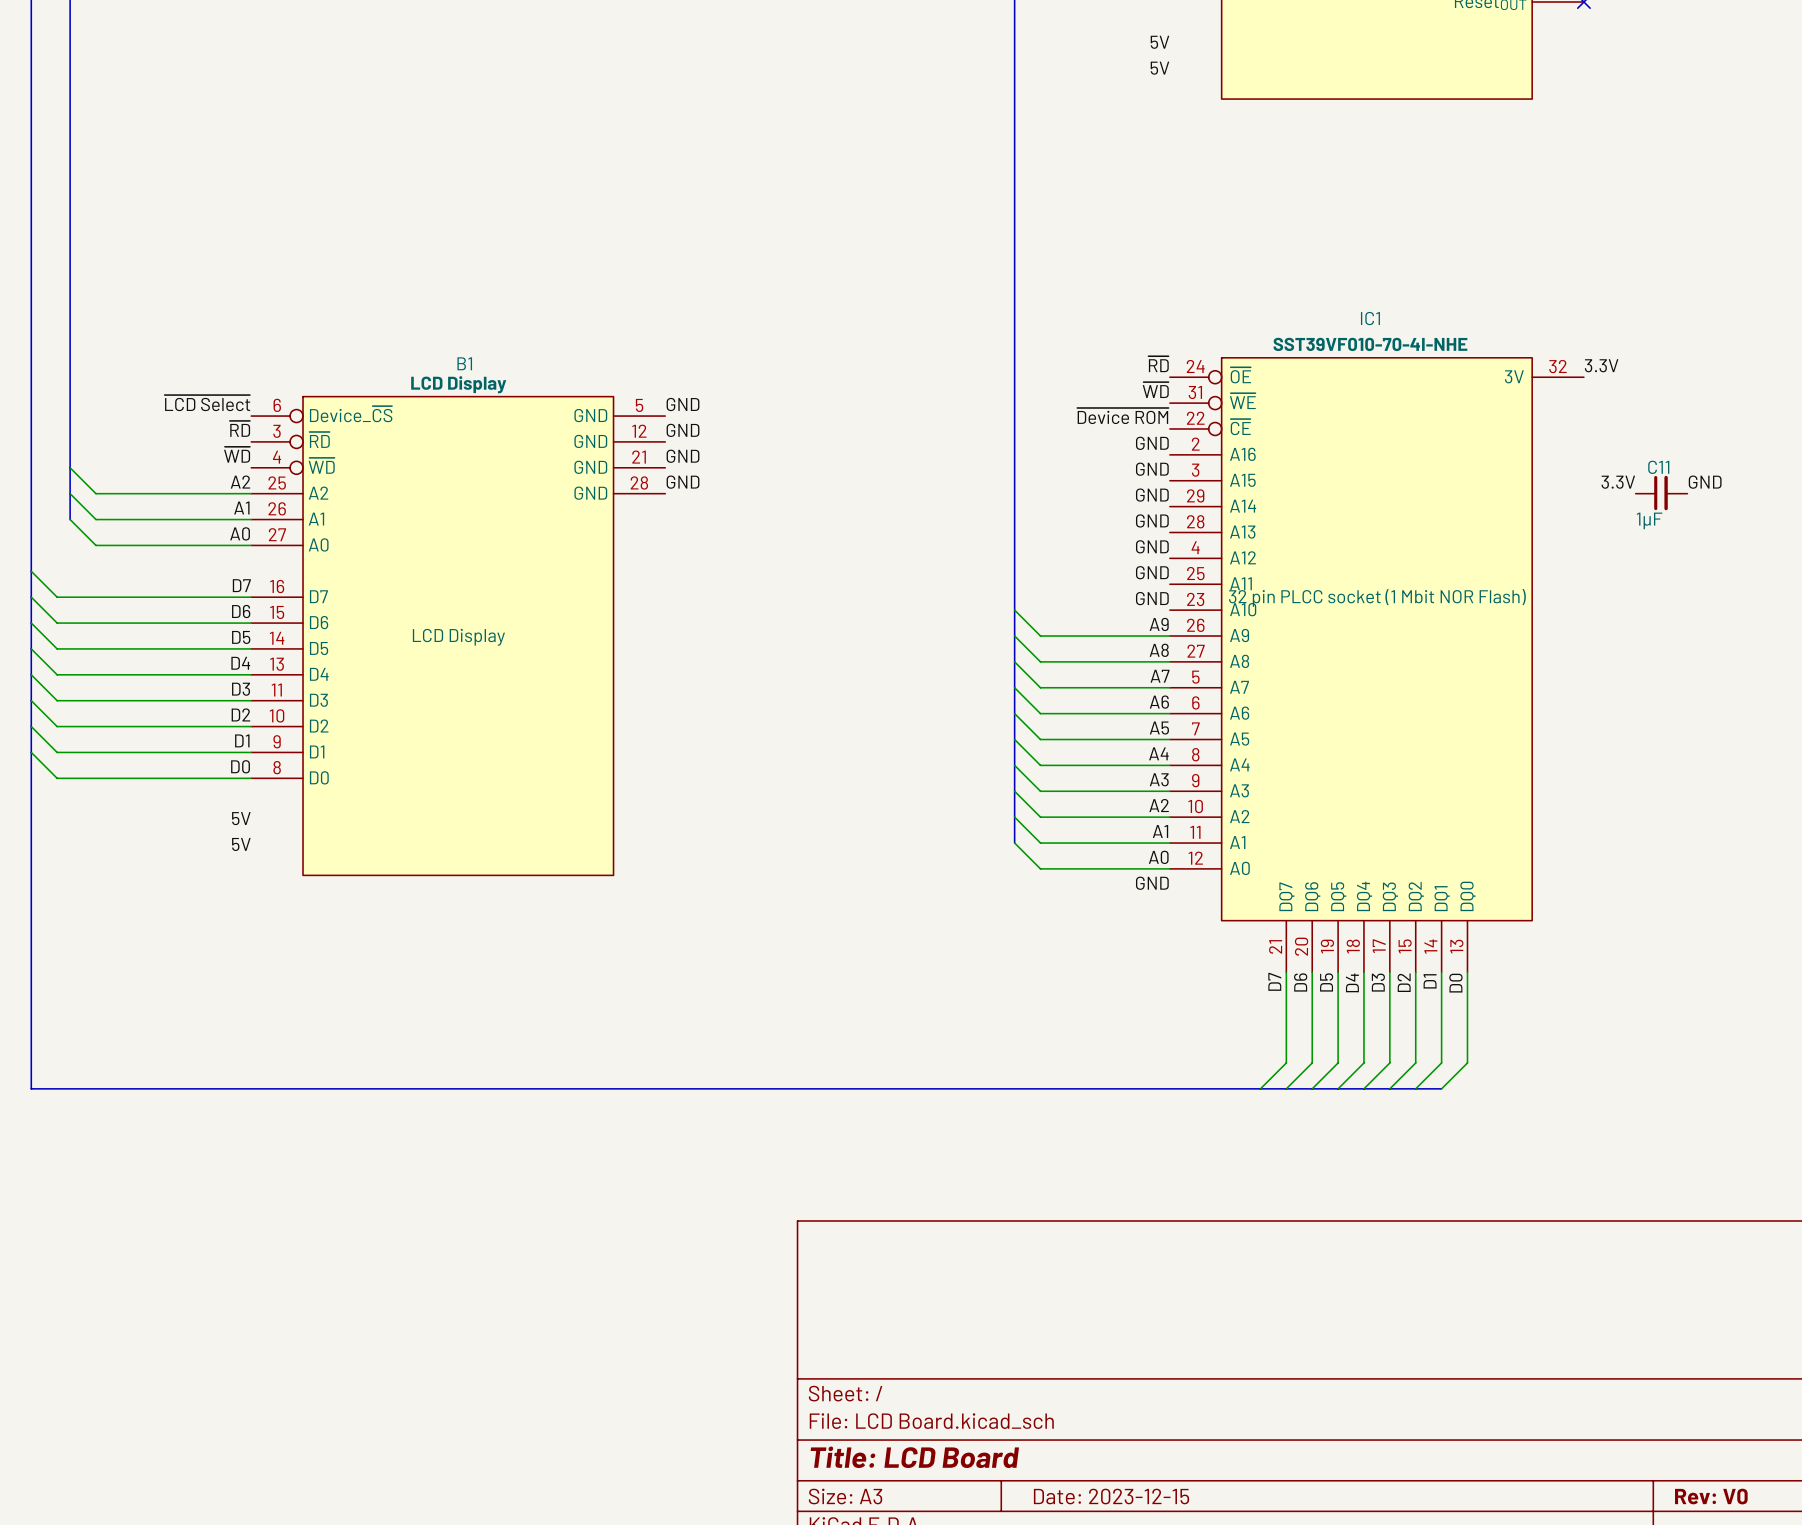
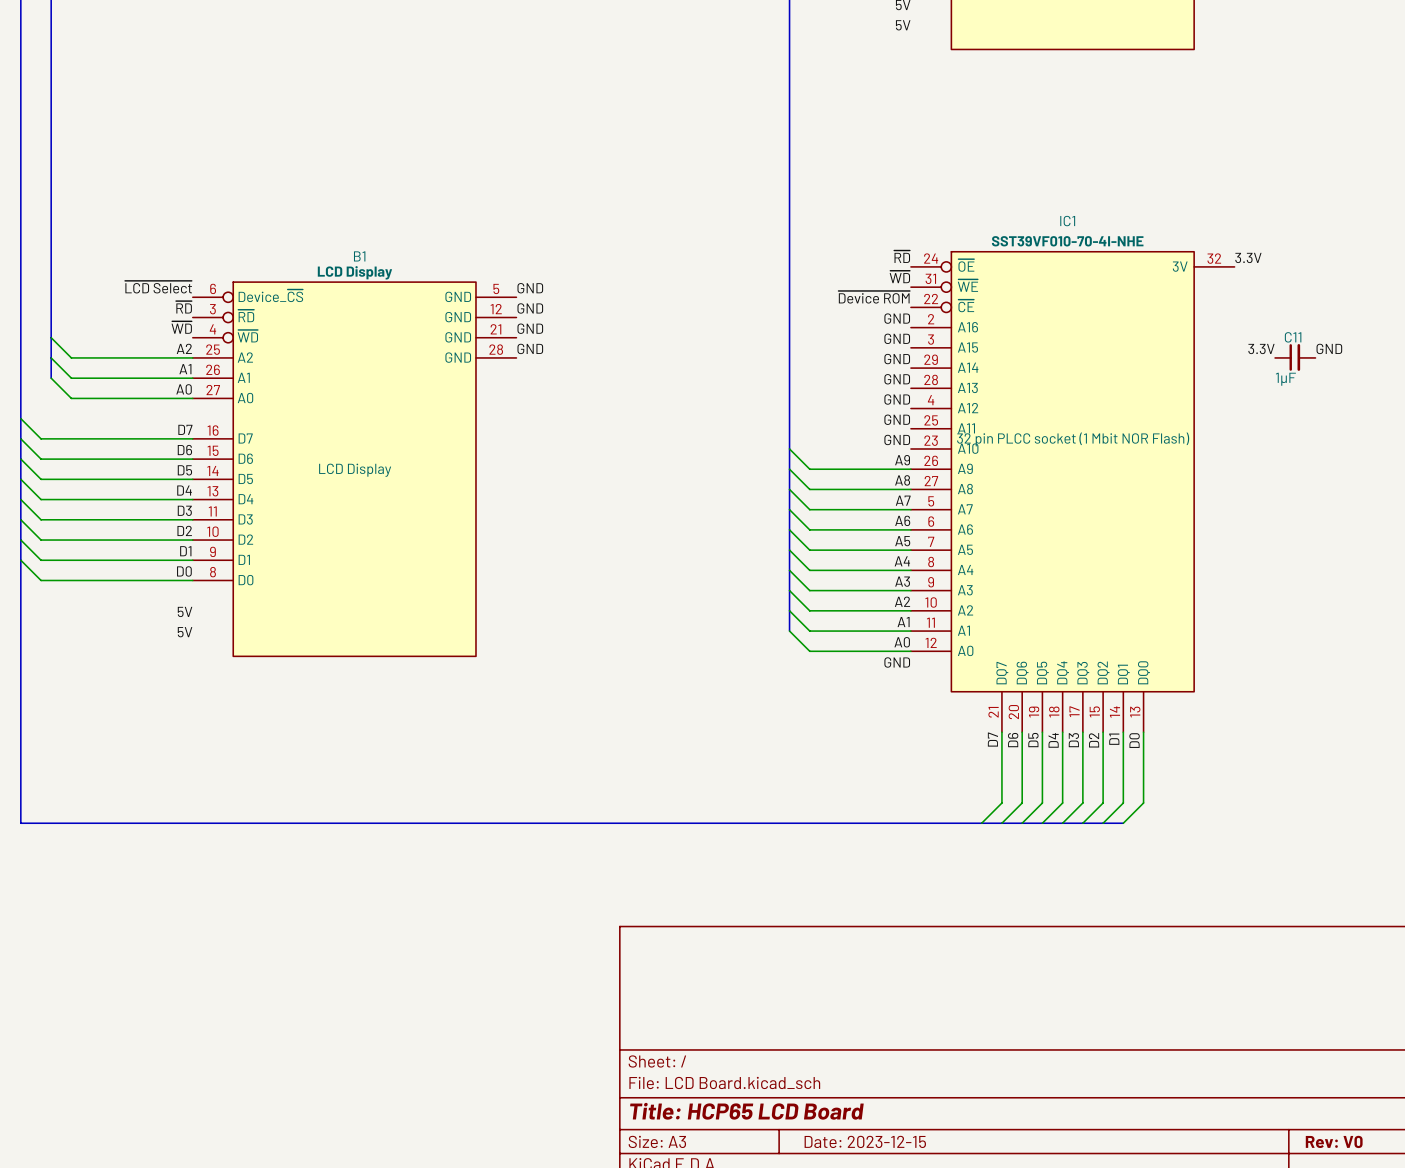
title block: Title: LCD Board (914, 1457) -> Title: HCP65 LCD Board (746, 1111)

